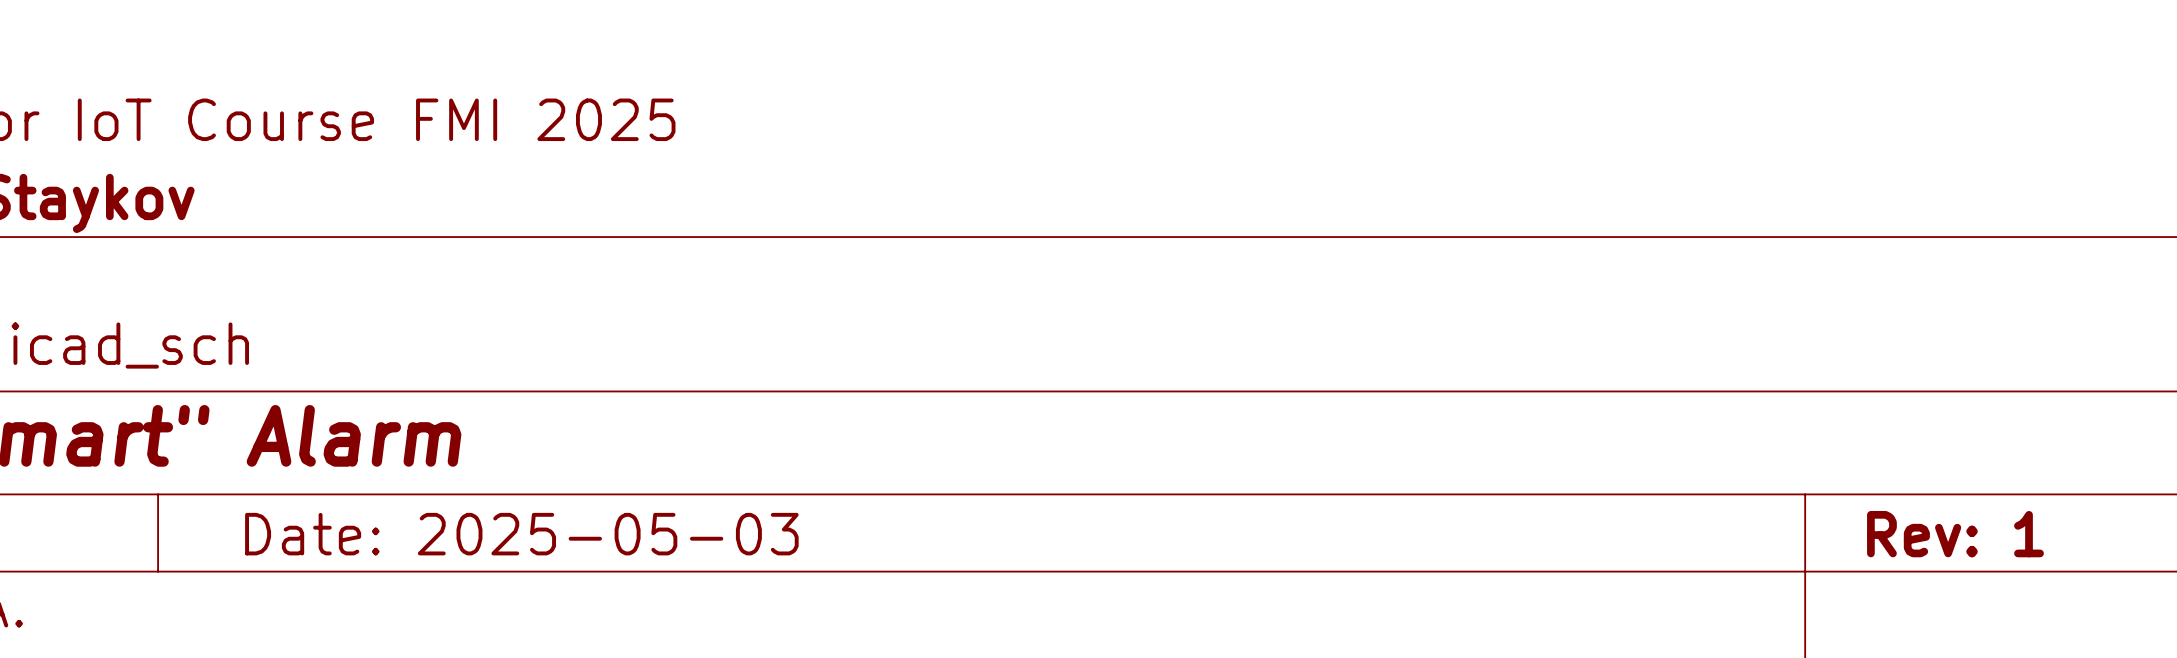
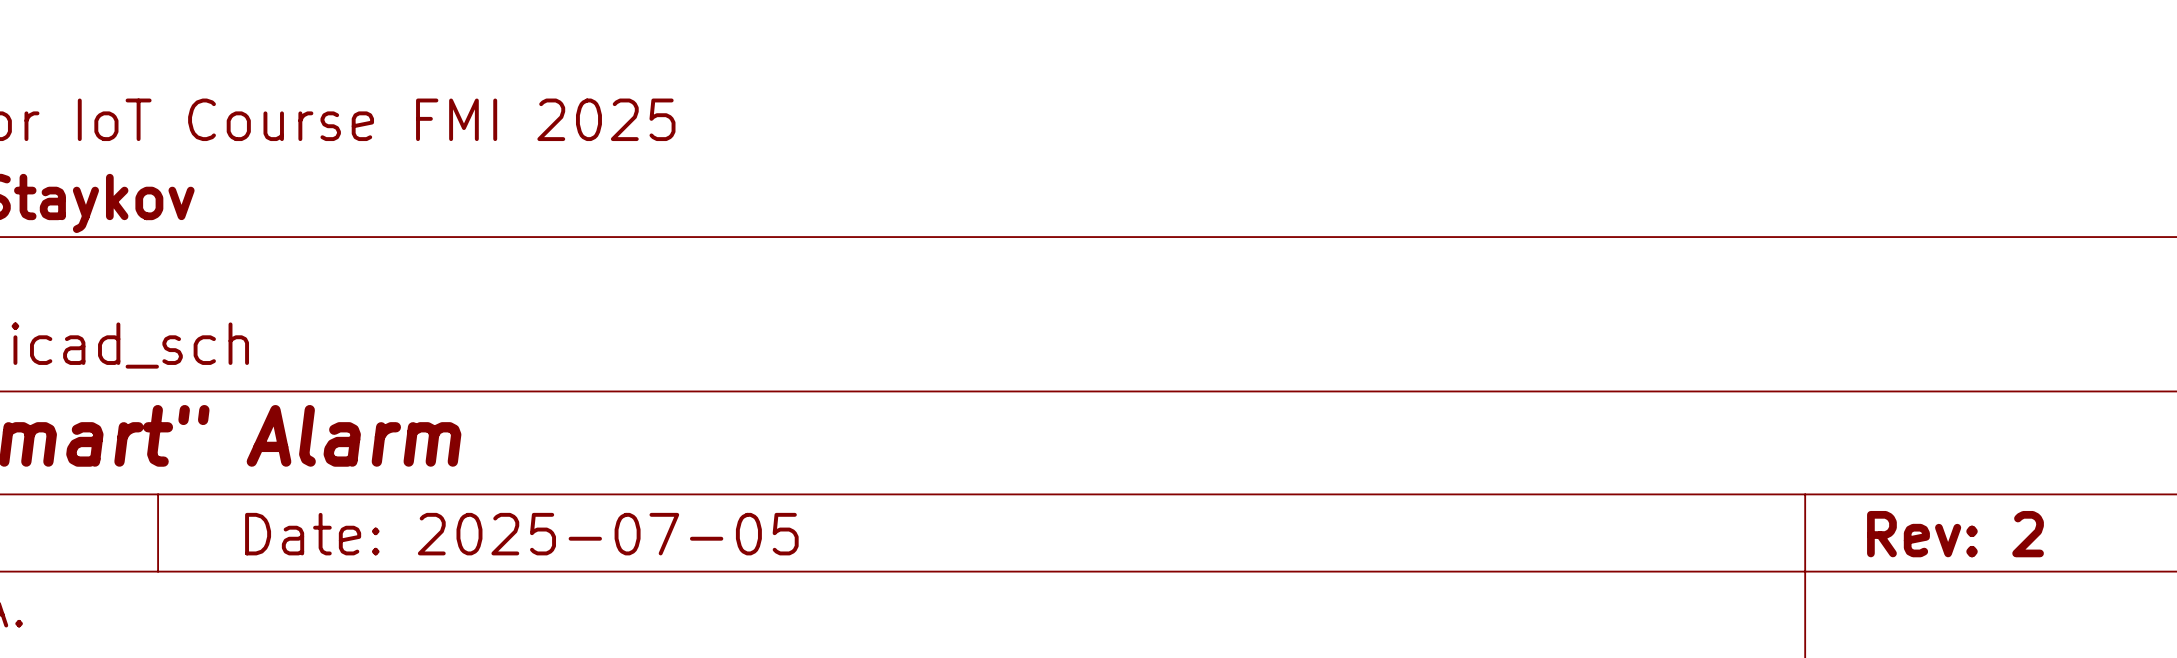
title block: Date: 2025-05-03 (521, 534) -> Date: 2025-07-05 (521, 534)
title block: Rev: 1 (1955, 534) -> Rev: 2 (1955, 534)

